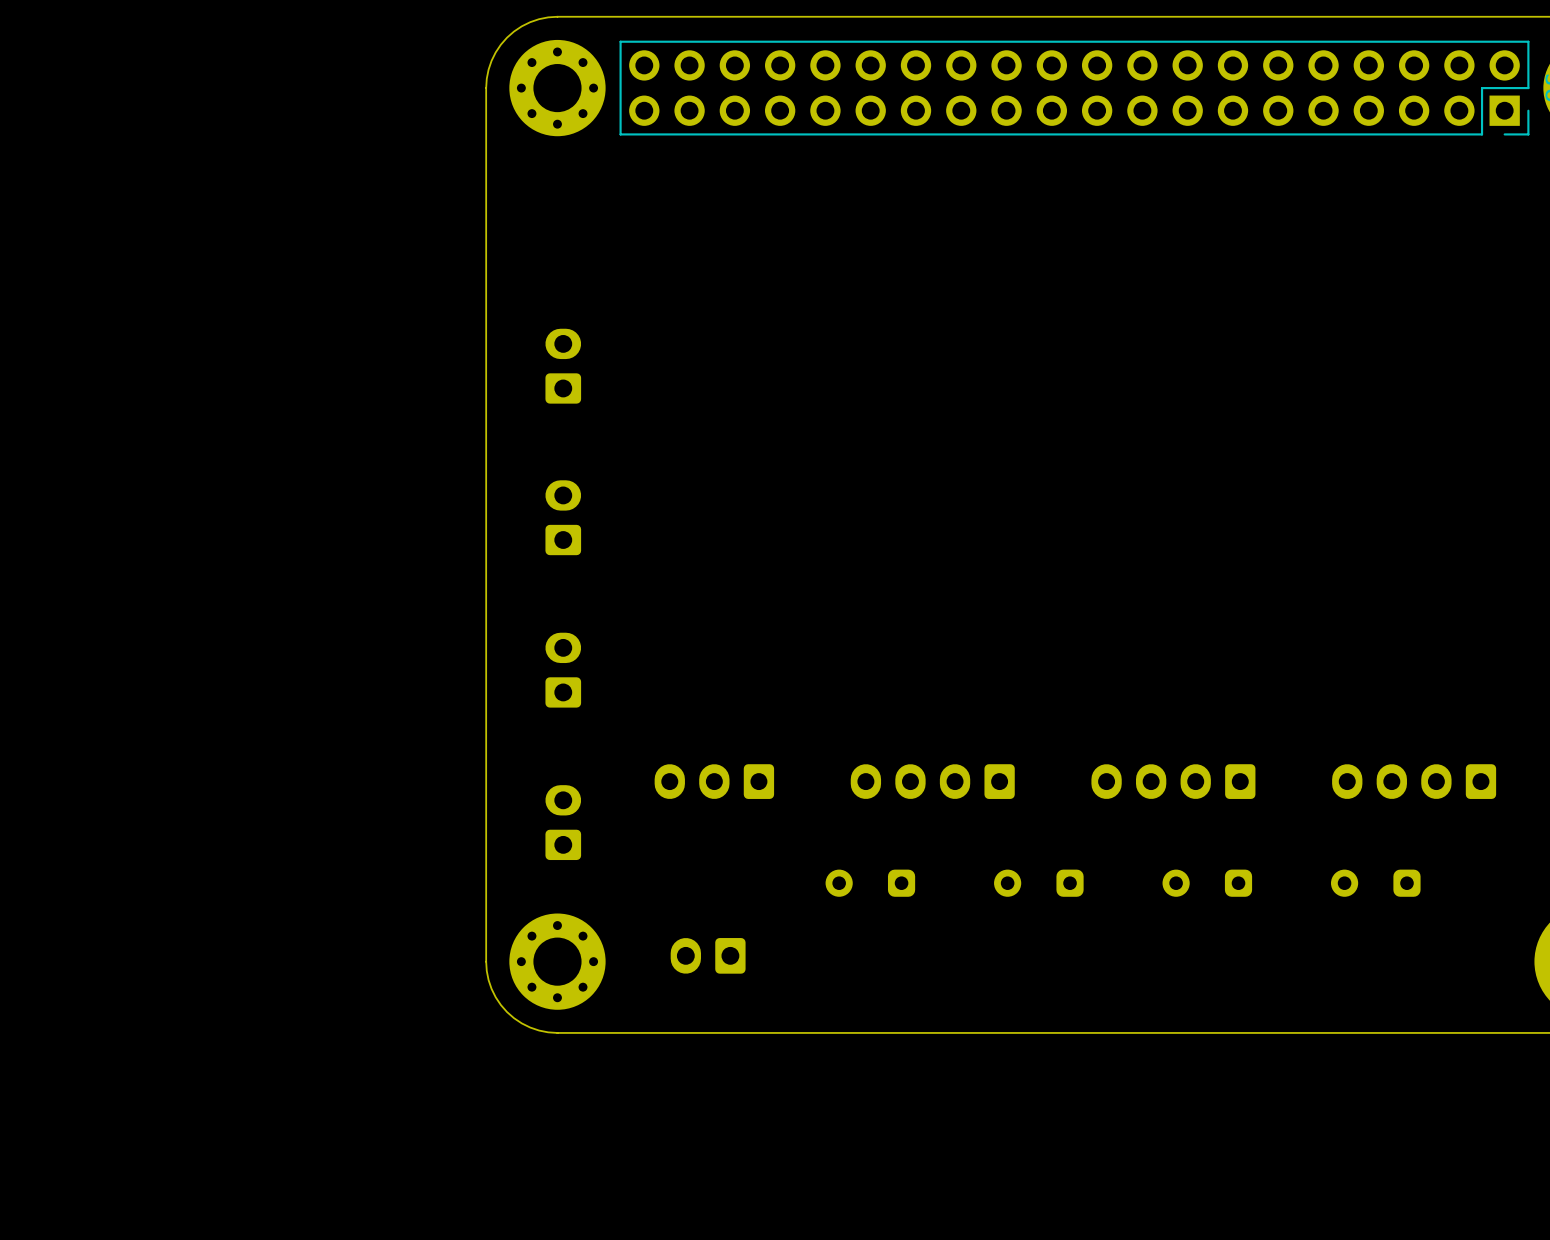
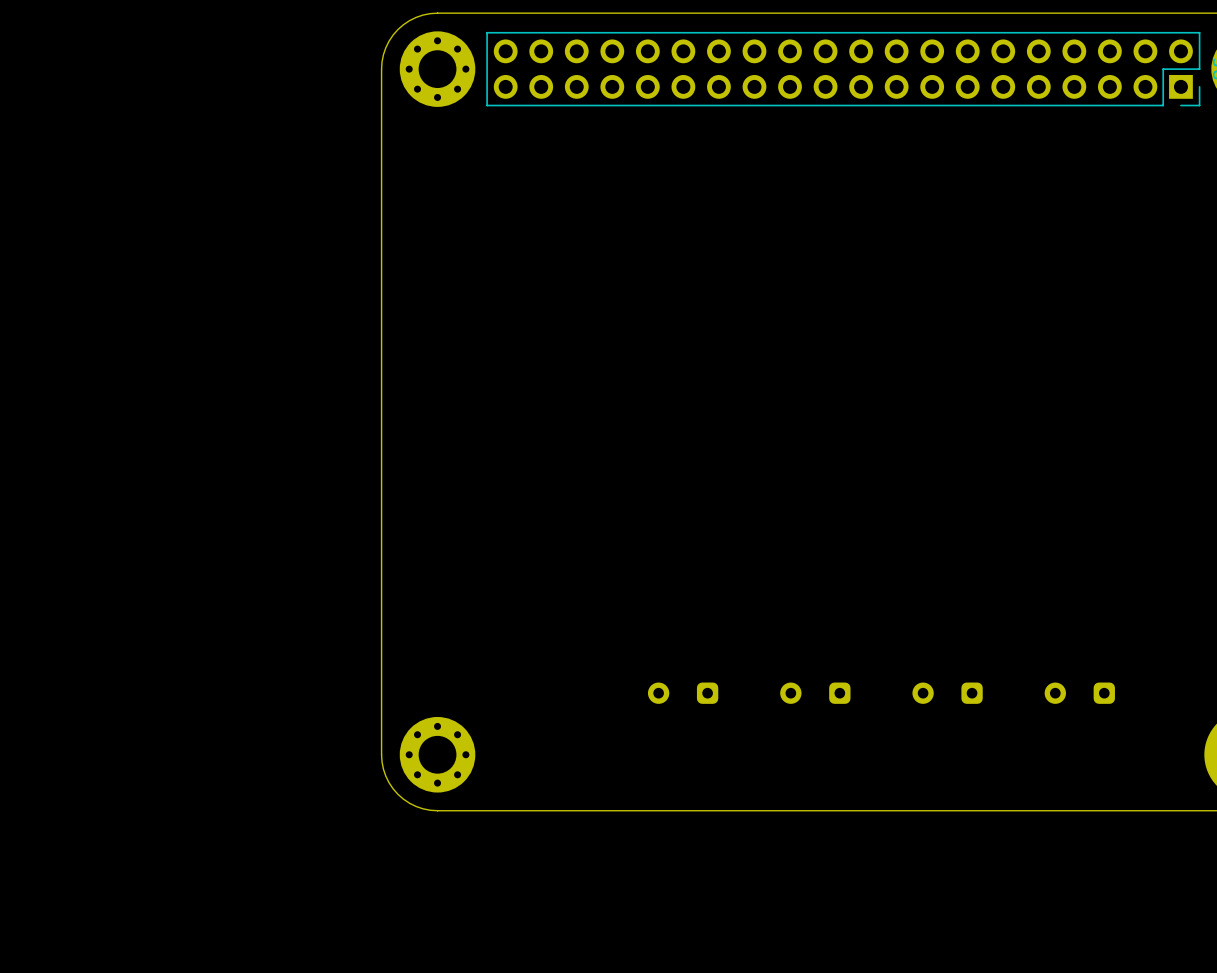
part: (563, 366) -> none
part: (563, 517) -> none
part: (563, 670) -> none
part: (714, 781) -> none
part: (932, 781) -> none
part: (1173, 781) -> none
part: (1414, 781) -> none
part: (563, 822) -> none
part: (708, 955) -> none

